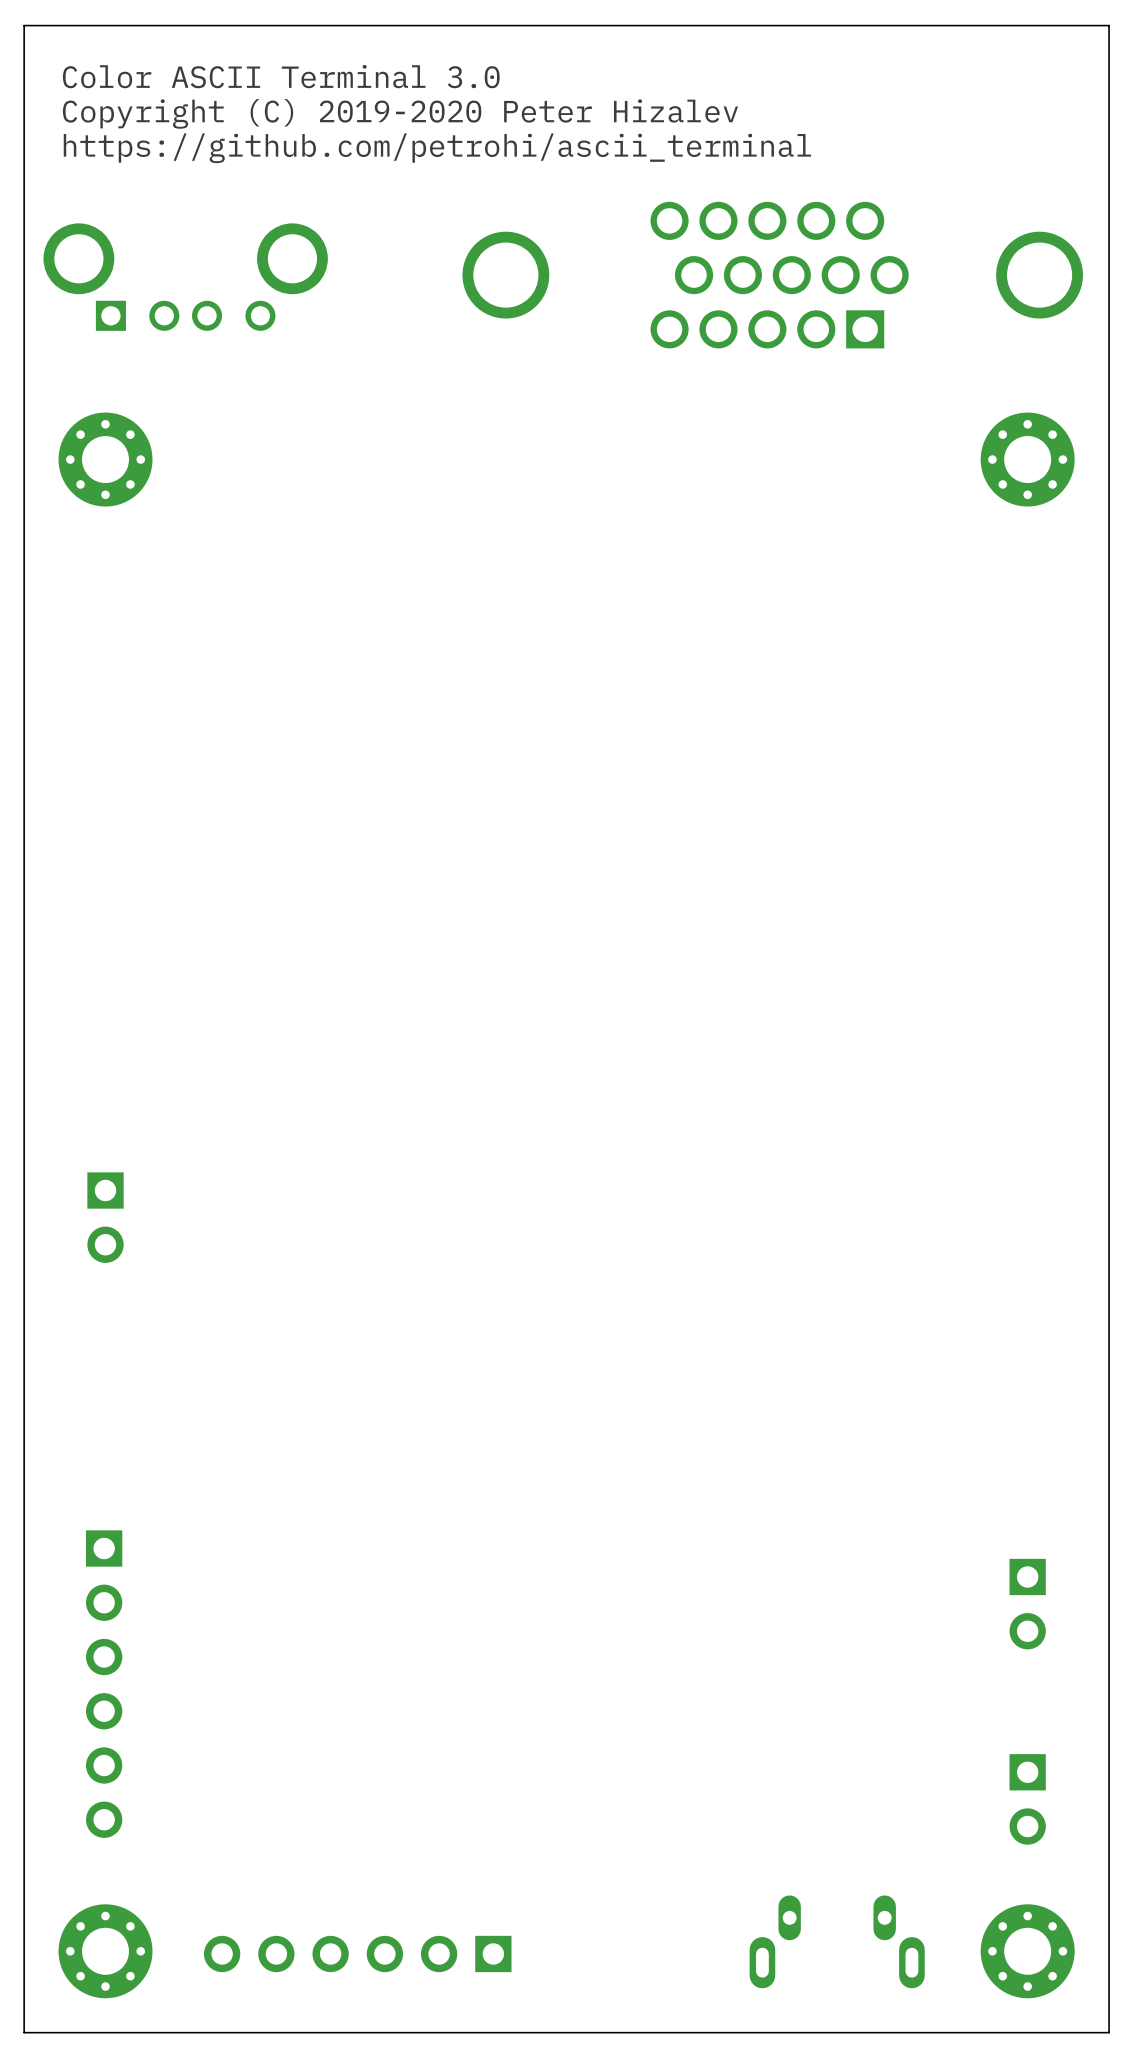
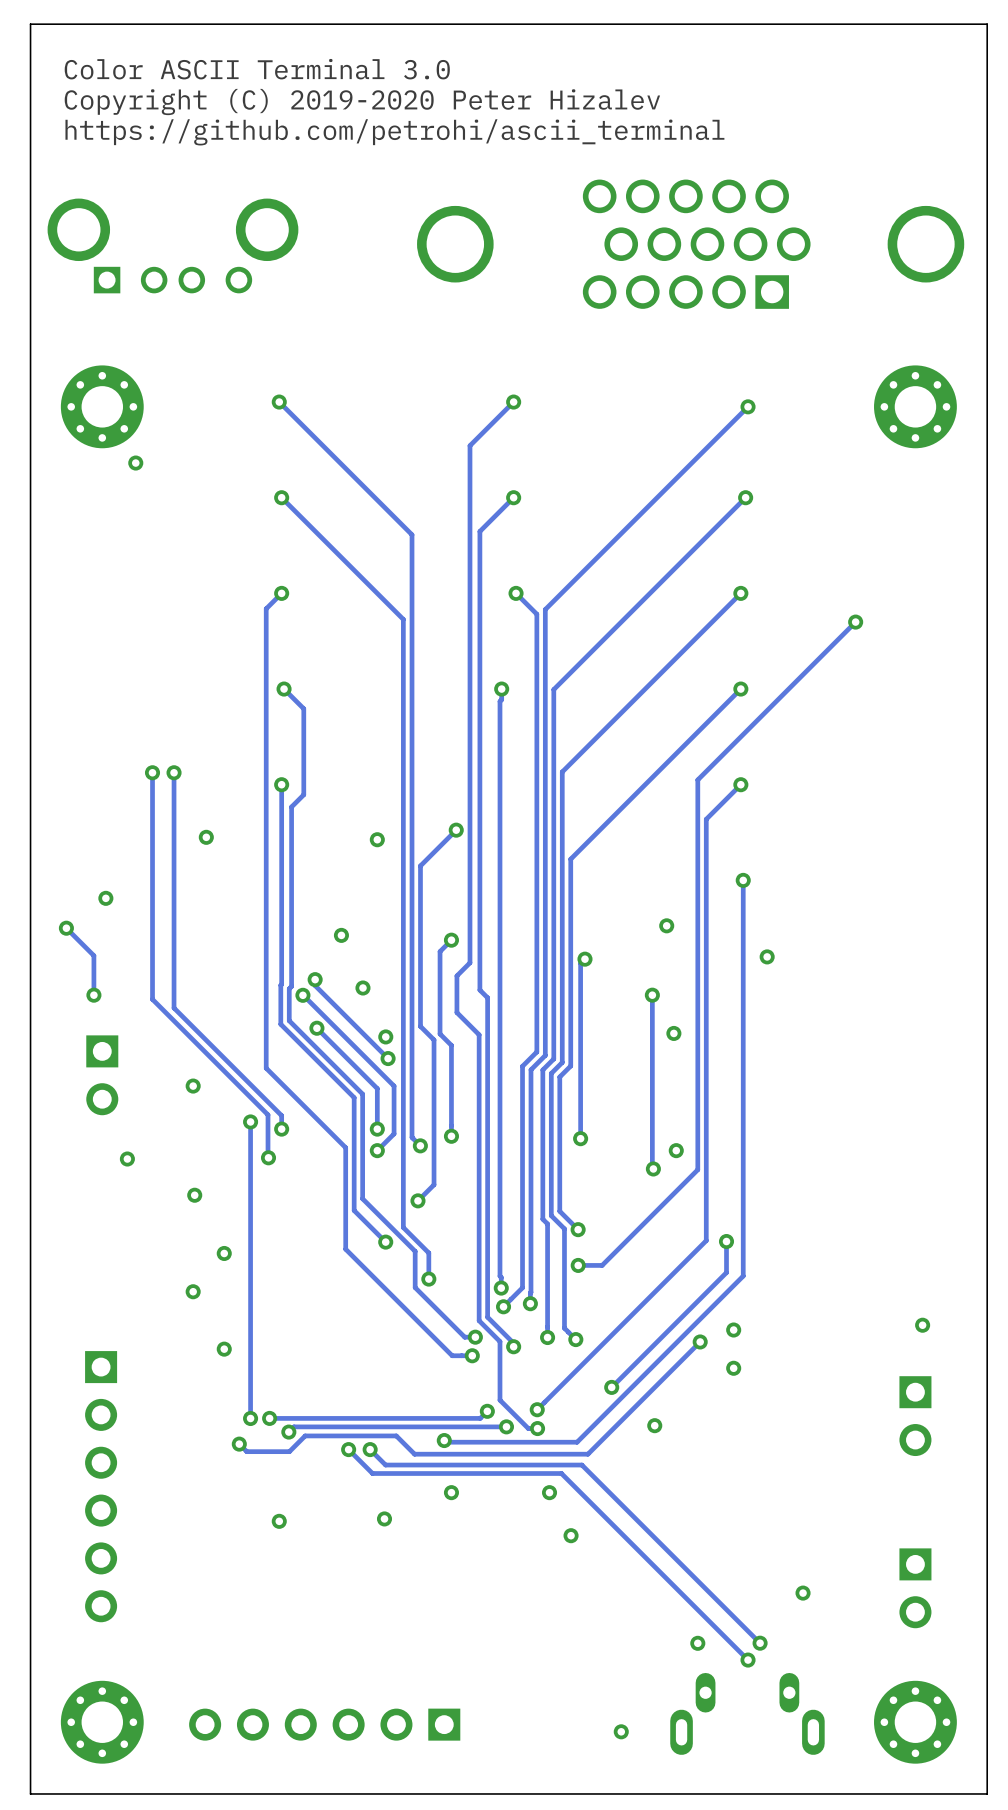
track: none -> (279, 402) (412, 534) (412, 1137) (420, 1145)
via: none -> (279, 402)
track: none -> (513, 402) (469, 445) (469, 962) (456, 975) (456, 1012) (479, 1034) (479, 1320) (499, 1341) (499, 1400) (528, 1428) (537, 1428)
via: none -> (513, 402)
track: none -> (748, 406) (545, 609) (545, 1055) (530, 1069) (530, 1303)
via: none -> (748, 406)
via: none -> (135, 463)
track: none -> (281, 497) (403, 619) (403, 1227) (428, 1253) (428, 1279)
via: none -> (281, 497)
track: none -> (513, 497) (479, 531) (479, 990) (487, 997) (487, 1317) (513, 1343) (513, 1346)
via: none -> (513, 497)
track: none -> (745, 497) (553, 689) (553, 1058) (542, 1069) (542, 1219) (547, 1223) (547, 1337)
via: none -> (745, 497)
track: none -> (281, 593) (266, 608) (266, 1068) (345, 1147) (345, 1249) (452, 1355) (472, 1355)
via: none -> (281, 593)
track: none -> (516, 593) (536, 614) (536, 1051) (522, 1066) (522, 1287) (503, 1306)
via: none -> (516, 593)
track: none -> (740, 593) (562, 771) (562, 1062) (551, 1073) (551, 1215) (564, 1228) (564, 1328) (575, 1339)
via: none -> (740, 593)
track: none -> (855, 622) (697, 779) (697, 1169) (602, 1265) (578, 1265)
via: none -> (855, 622)
track: none -> (284, 689) (303, 708) (303, 794) (291, 806) (291, 986) (289, 988) (289, 1020) (362, 1094) (362, 1198) (415, 1251) (415, 1287) (464, 1337) (475, 1337)
via: none -> (284, 689)
track: none -> (501, 689) (499, 701) (501, 1288)
via: none -> (501, 689)
track: none -> (740, 689) (570, 859) (570, 1066) (559, 1076) (559, 1211) (578, 1229)
via: none -> (740, 689)
track: none -> (152, 772) (152, 999) (268, 1114) (268, 1157)
via: none -> (152, 772)
track: none -> (174, 772) (174, 1008) (281, 1115) (281, 1129)
via: none -> (174, 772)
track: none -> (281, 784) (280, 1024) (354, 1097) (354, 1210) (385, 1242)
via: none -> (281, 784)
track: none -> (740, 784) (706, 819) (706, 1240) (537, 1409)
via: none -> (740, 784)
track: none -> (456, 830) (420, 865) (420, 1026) (434, 1039) (434, 1184) (417, 1200)
via: none -> (456, 830)
via: none -> (206, 837)
via: none -> (377, 839)
track: none -> (743, 880) (743, 1276) (577, 1442) (445, 1442) (444, 1440)
via: none -> (743, 880)
via: none -> (105, 898)
via: none -> (666, 925)
track: none -> (66, 928) (93, 955) (93, 995)
via: none -> (66, 928)
via: none -> (341, 935)
track: none -> (451, 940) (440, 951) (440, 1033) (451, 1045) (451, 1136)
via: none -> (451, 940)
via: none -> (767, 956)
track: none -> (584, 959) (580, 963) (580, 1138)
via: none -> (584, 959)
track: none -> (315, 979) (315, 985) (388, 1058)
via: none -> (315, 979)
via: none -> (362, 988)
via: none -> (93, 995)
track: none -> (302, 995) (394, 1086) (394, 1133) (377, 1150)
via: none -> (302, 995)
track: none -> (652, 995) (653, 1168)
via: none -> (652, 995)
track: none -> (316, 1028) (377, 1088) (377, 1129)
via: none -> (316, 1028)
via: none -> (673, 1033)
via: none -> (385, 1036)
via: none -> (388, 1058)
via: none -> (193, 1086)
track: none -> (250, 1121) (250, 1418)
via: none -> (250, 1121)
via: none -> (281, 1129)
via: none -> (377, 1129)
via: none -> (451, 1136)
via: none -> (580, 1138)
via: none -> (420, 1145)
via: none -> (377, 1150)
via: none -> (676, 1150)
via: none -> (268, 1157)
via: none -> (127, 1159)
via: none -> (653, 1168)
via: none -> (194, 1195)
via: none -> (417, 1200)
via: none -> (578, 1229)
via: none -> (385, 1242)
track: none -> (726, 1241) (726, 1272) (611, 1387)
via: none -> (726, 1241)
via: none -> (224, 1253)
via: none -> (578, 1265)
via: none -> (428, 1279)
via: none -> (501, 1288)
via: none -> (193, 1291)
via: none -> (530, 1303)
via: none -> (503, 1306)
via: none -> (922, 1325)
via: none -> (733, 1330)
via: none -> (475, 1337)
via: none -> (547, 1337)
via: none -> (575, 1339)
track: none -> (700, 1341) (587, 1454) (414, 1454) (396, 1435) (305, 1435) (289, 1451) (246, 1451) (239, 1444)
via: none -> (700, 1341)
via: none -> (513, 1346)
via: none -> (224, 1349)
via: none -> (472, 1355)
via: none -> (733, 1368)
via: none -> (611, 1387)
via: none -> (537, 1409)
track: none -> (487, 1411) (480, 1418) (269, 1418)
via: none -> (487, 1411)
via: none -> (250, 1418)
via: none -> (269, 1418)
via: none -> (654, 1425)
track: none -> (506, 1426) (294, 1426) (288, 1432)
via: none -> (506, 1426)
via: none -> (537, 1428)
via: none -> (288, 1432)
via: none -> (444, 1440)
via: none -> (239, 1444)
track: none -> (348, 1449) (372, 1473) (561, 1473) (748, 1660)
via: none -> (348, 1449)
track: none -> (370, 1449) (385, 1465) (581, 1465) (760, 1643)
via: none -> (370, 1449)
via: none -> (451, 1492)
via: none -> (549, 1492)
via: none -> (384, 1518)
via: none -> (279, 1521)
via: none -> (571, 1535)
via: none -> (803, 1593)
via: none -> (697, 1643)
via: none -> (760, 1643)
via: none -> (748, 1660)
via: none -> (621, 1731)

